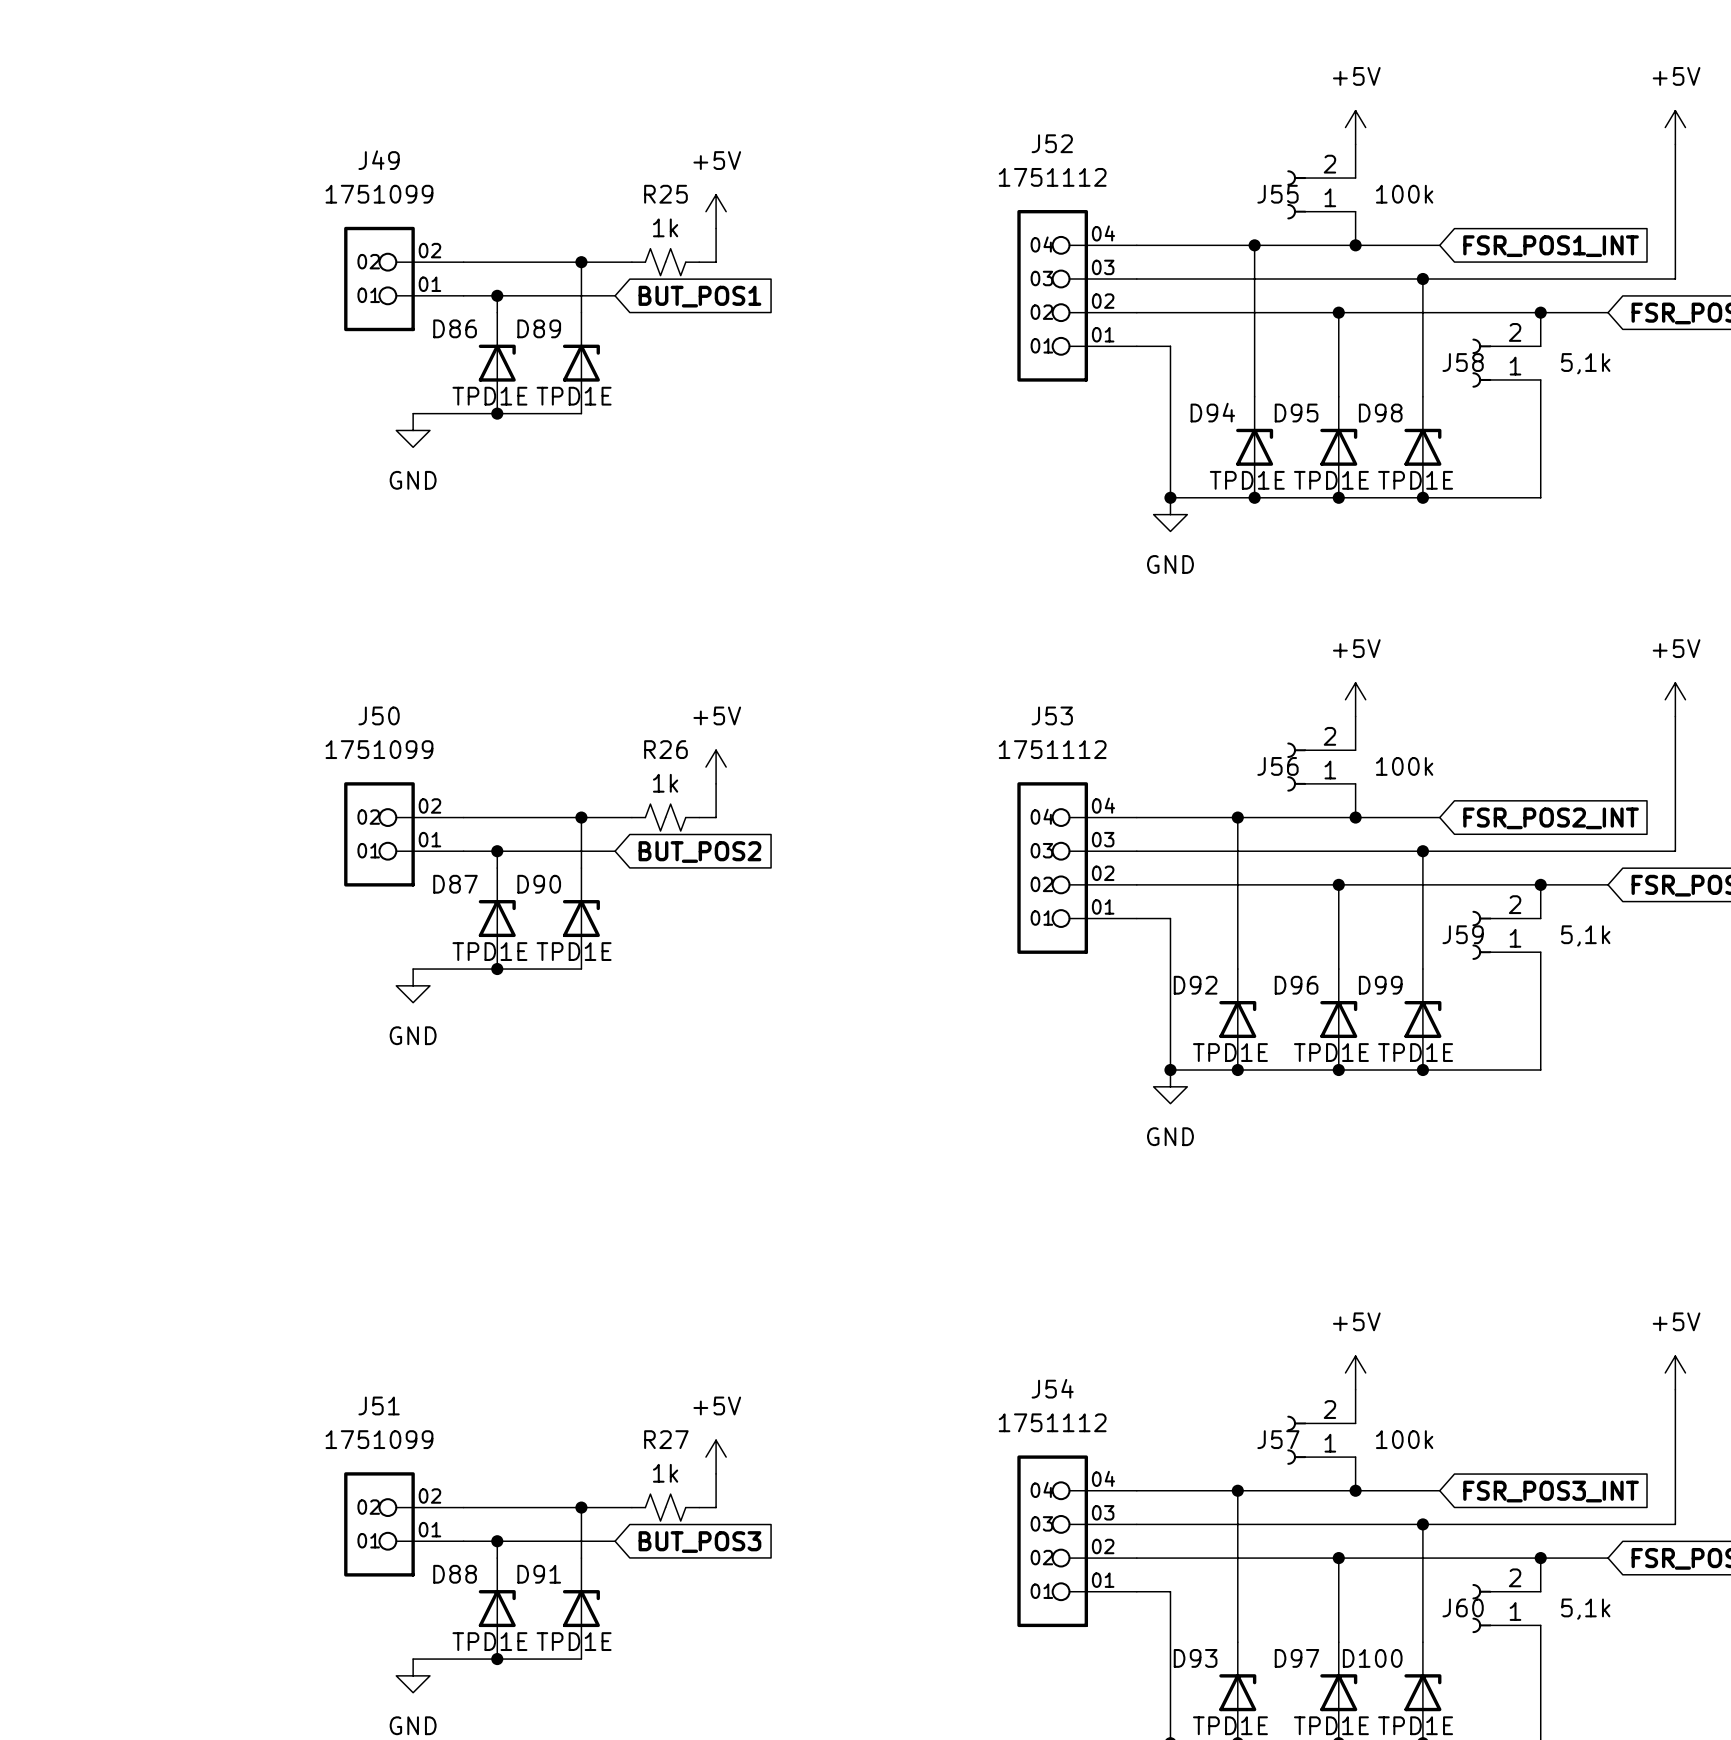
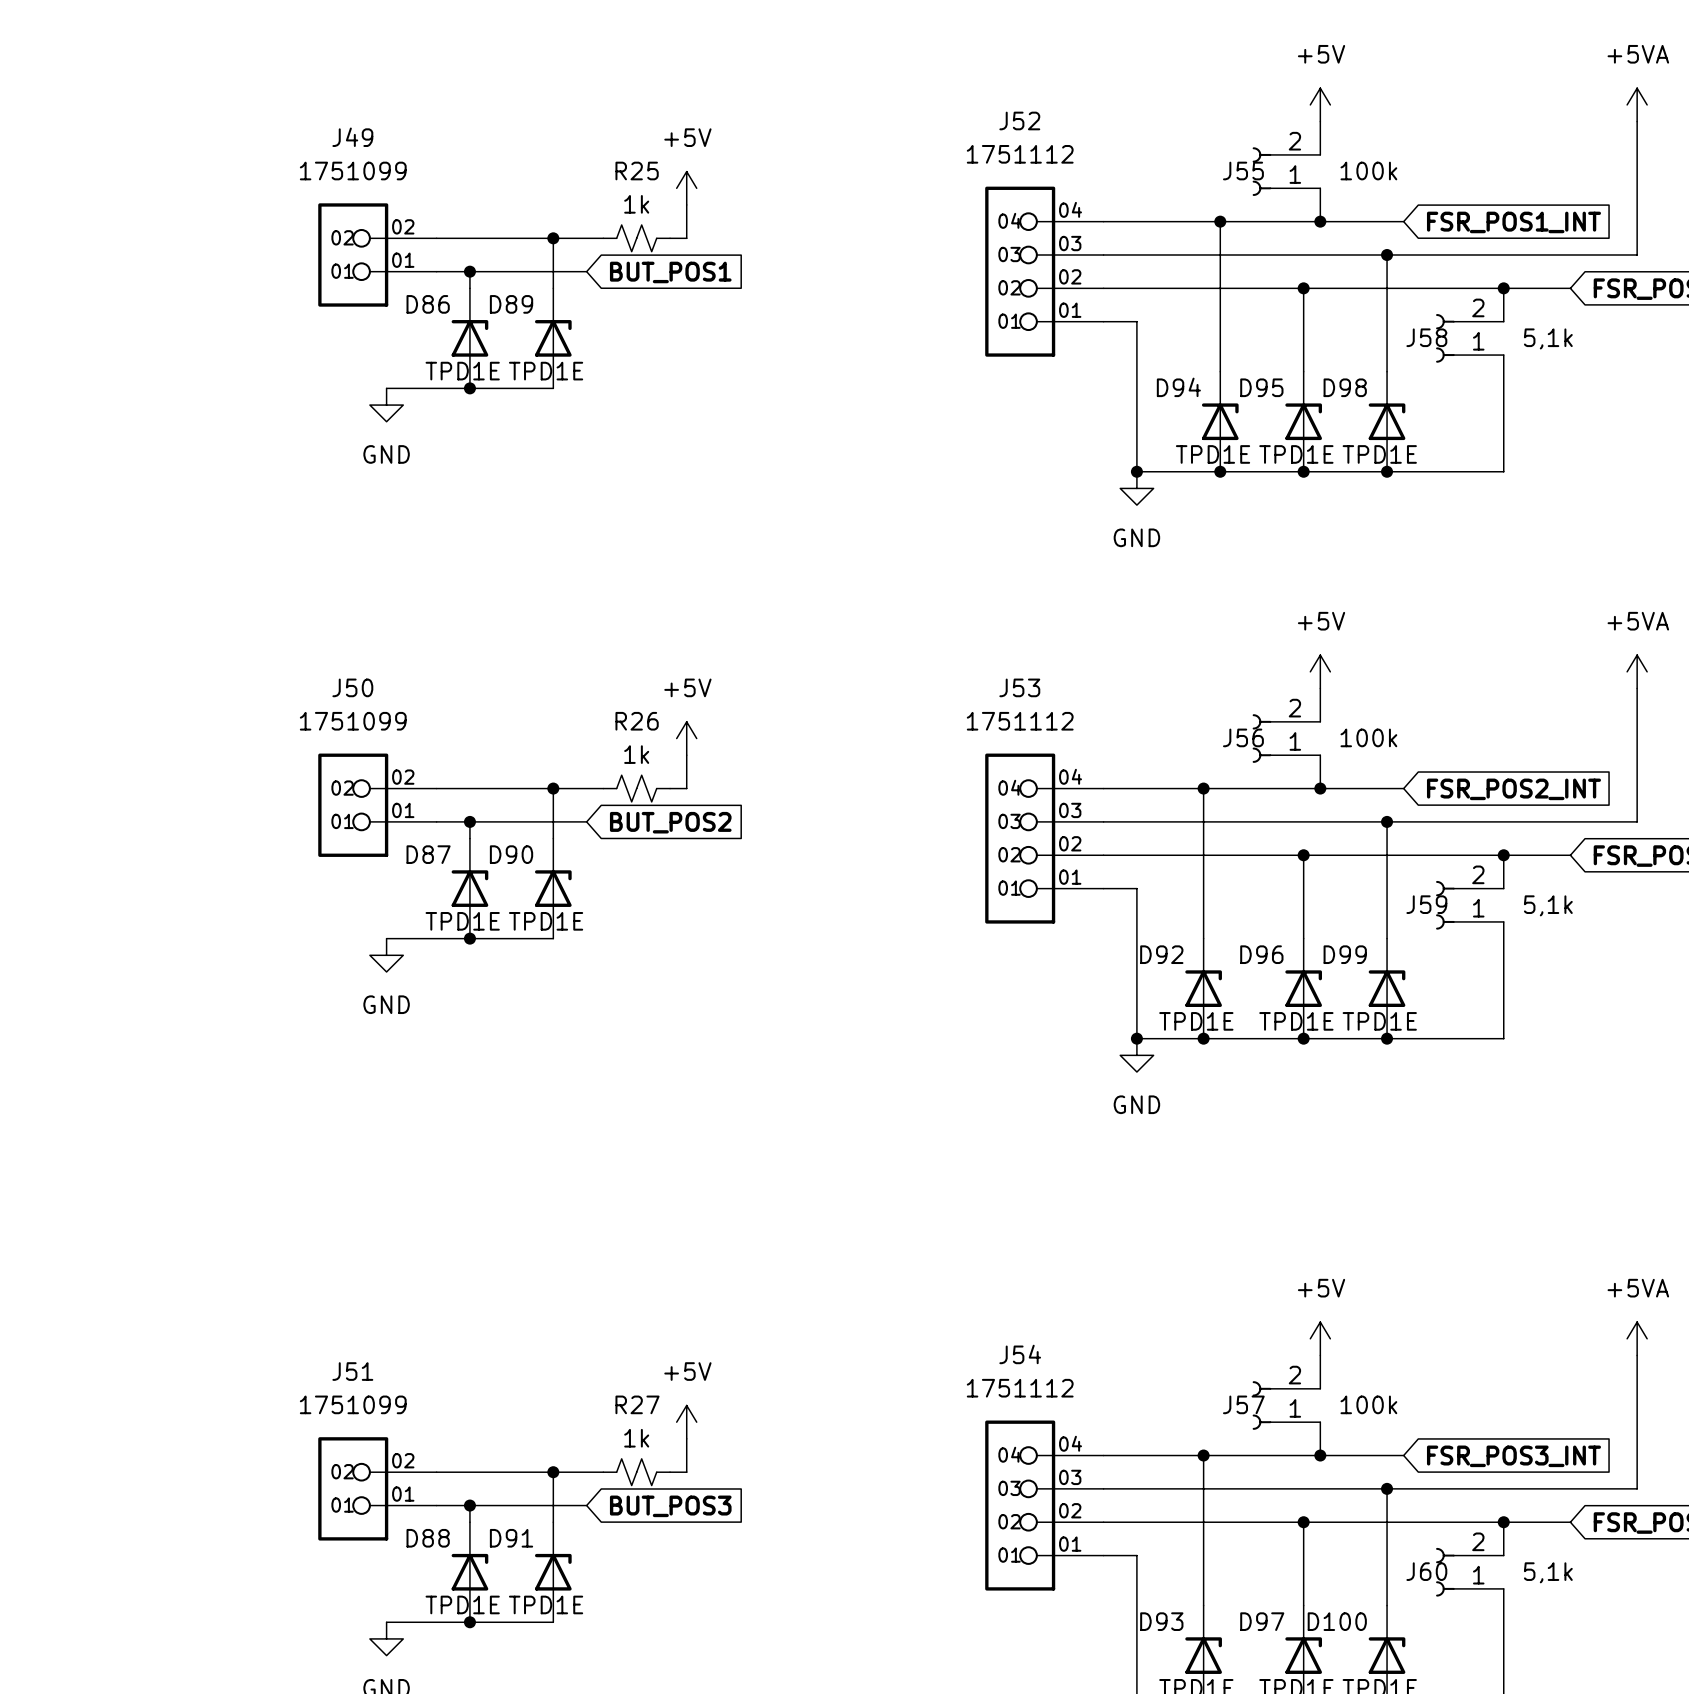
power symbol: +5V (1675, 127) -> +5VA (1637, 104)
power symbol: +5V (1675, 699) -> +5VA (1637, 671)
power symbol: +5V (1675, 1372) -> +5VA (1637, 1338)

